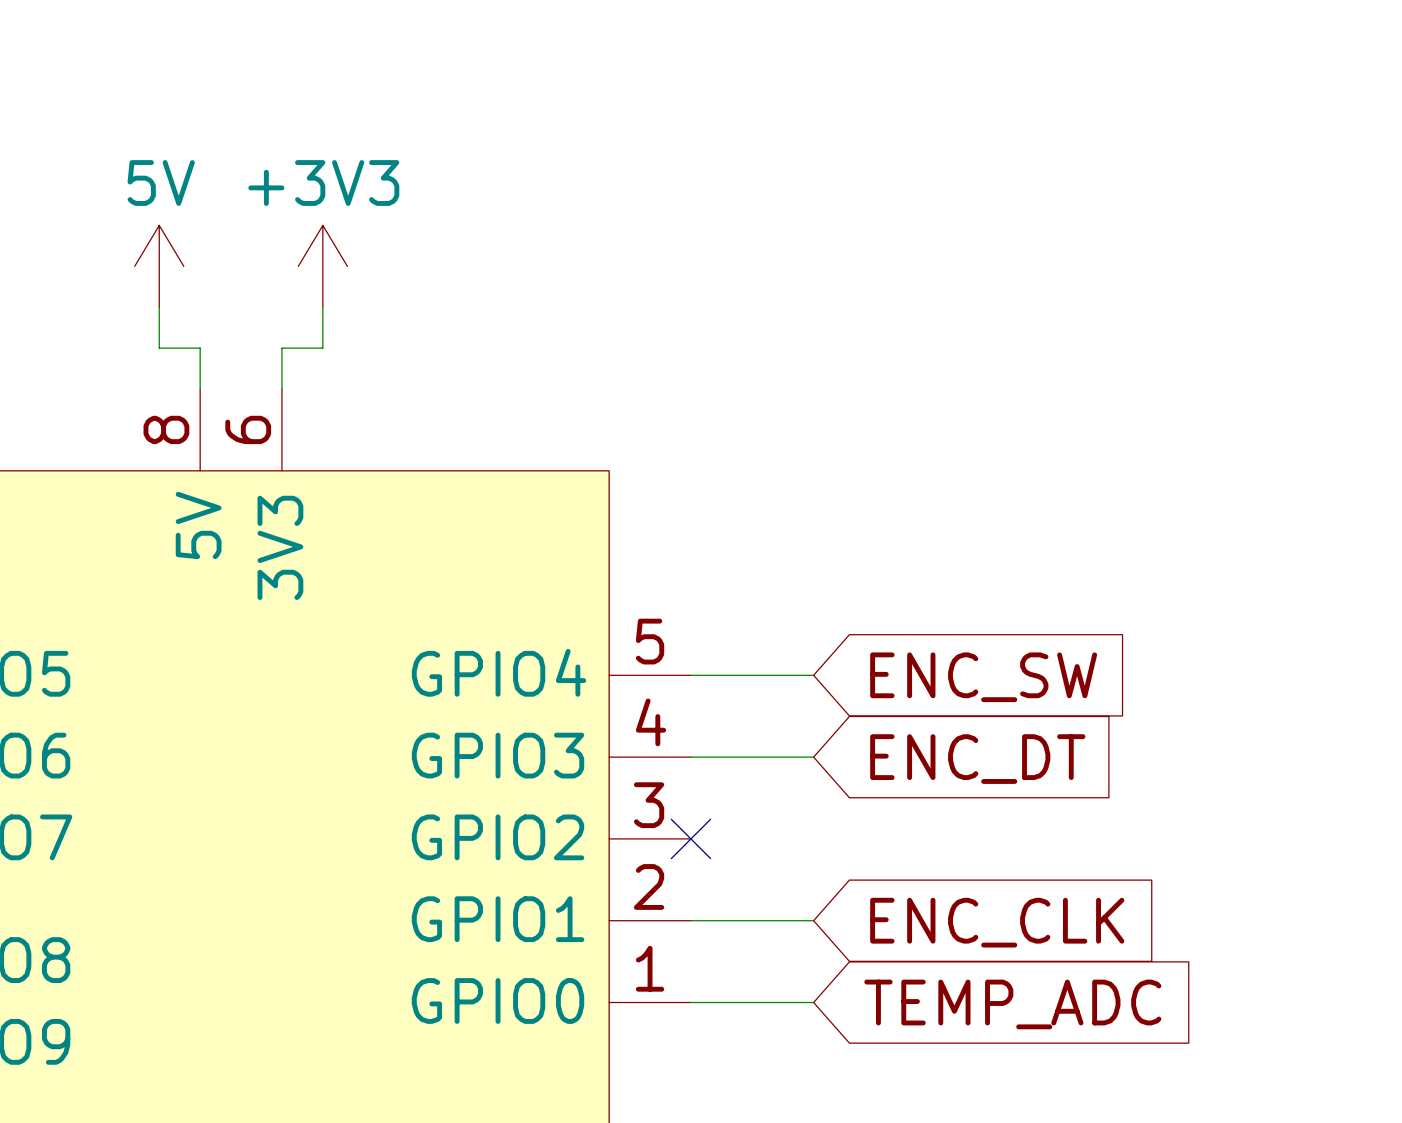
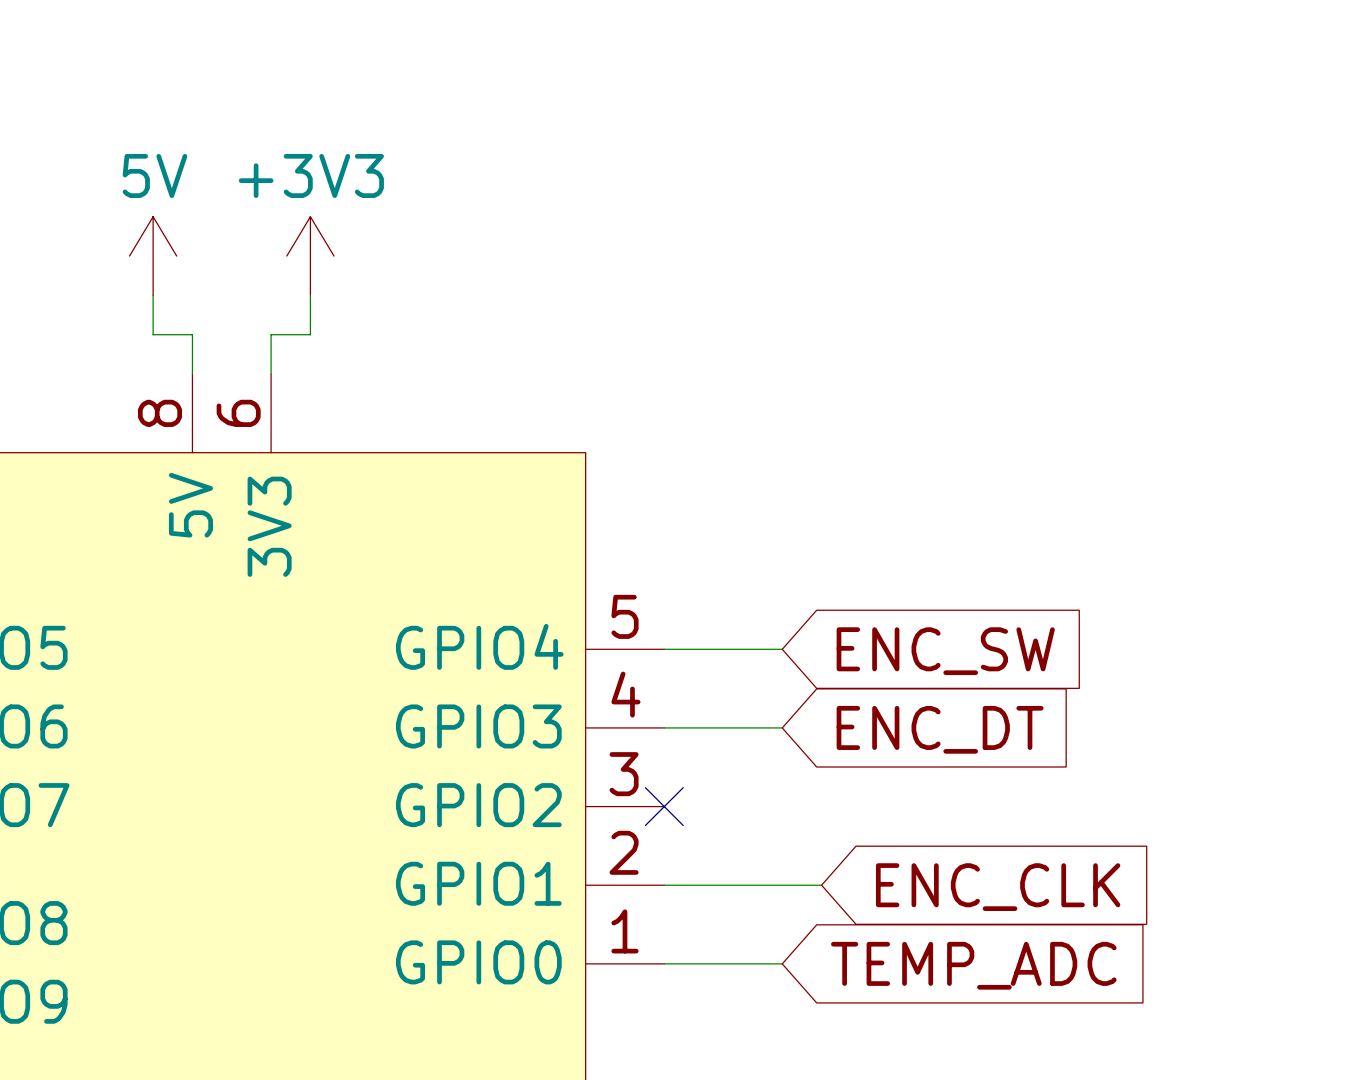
wire: none -> (782, 885) (821, 885)
global label position: ENC_CLK (997, 922) -> ENC_CLK (998, 887)

